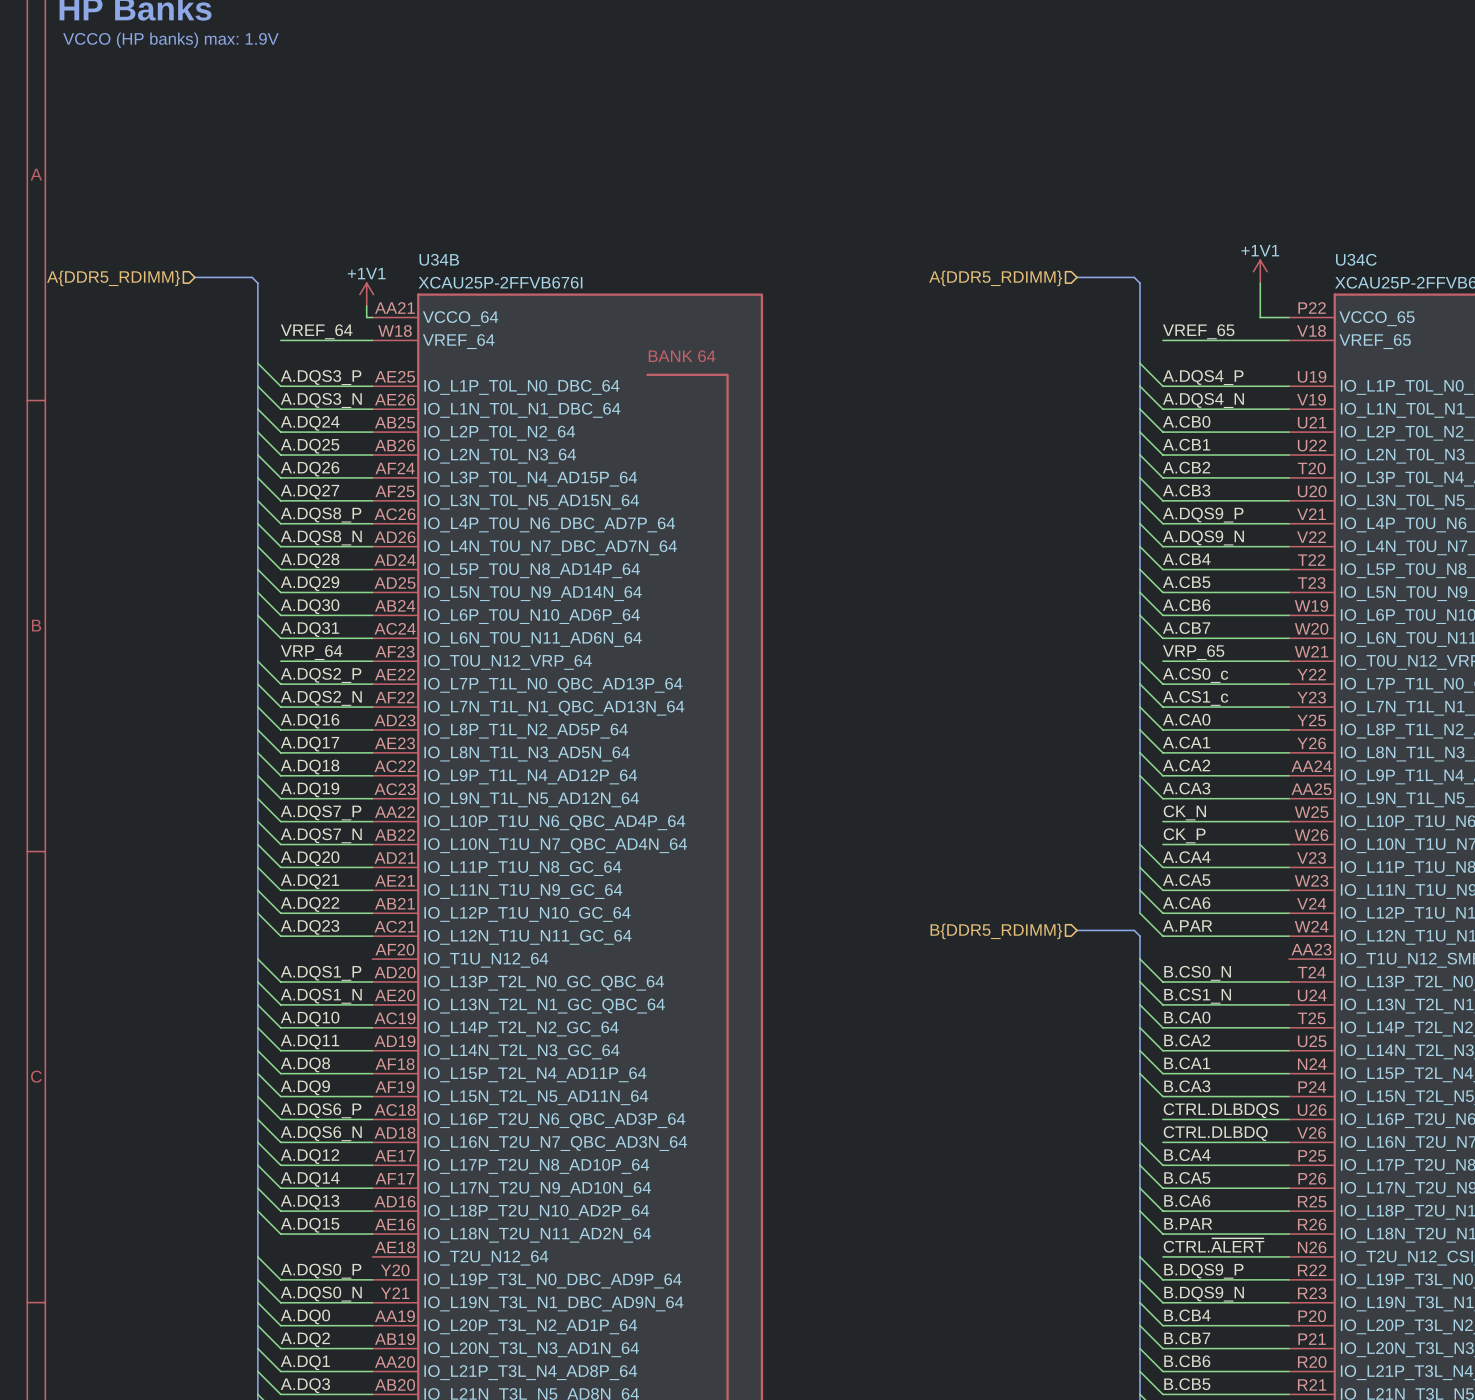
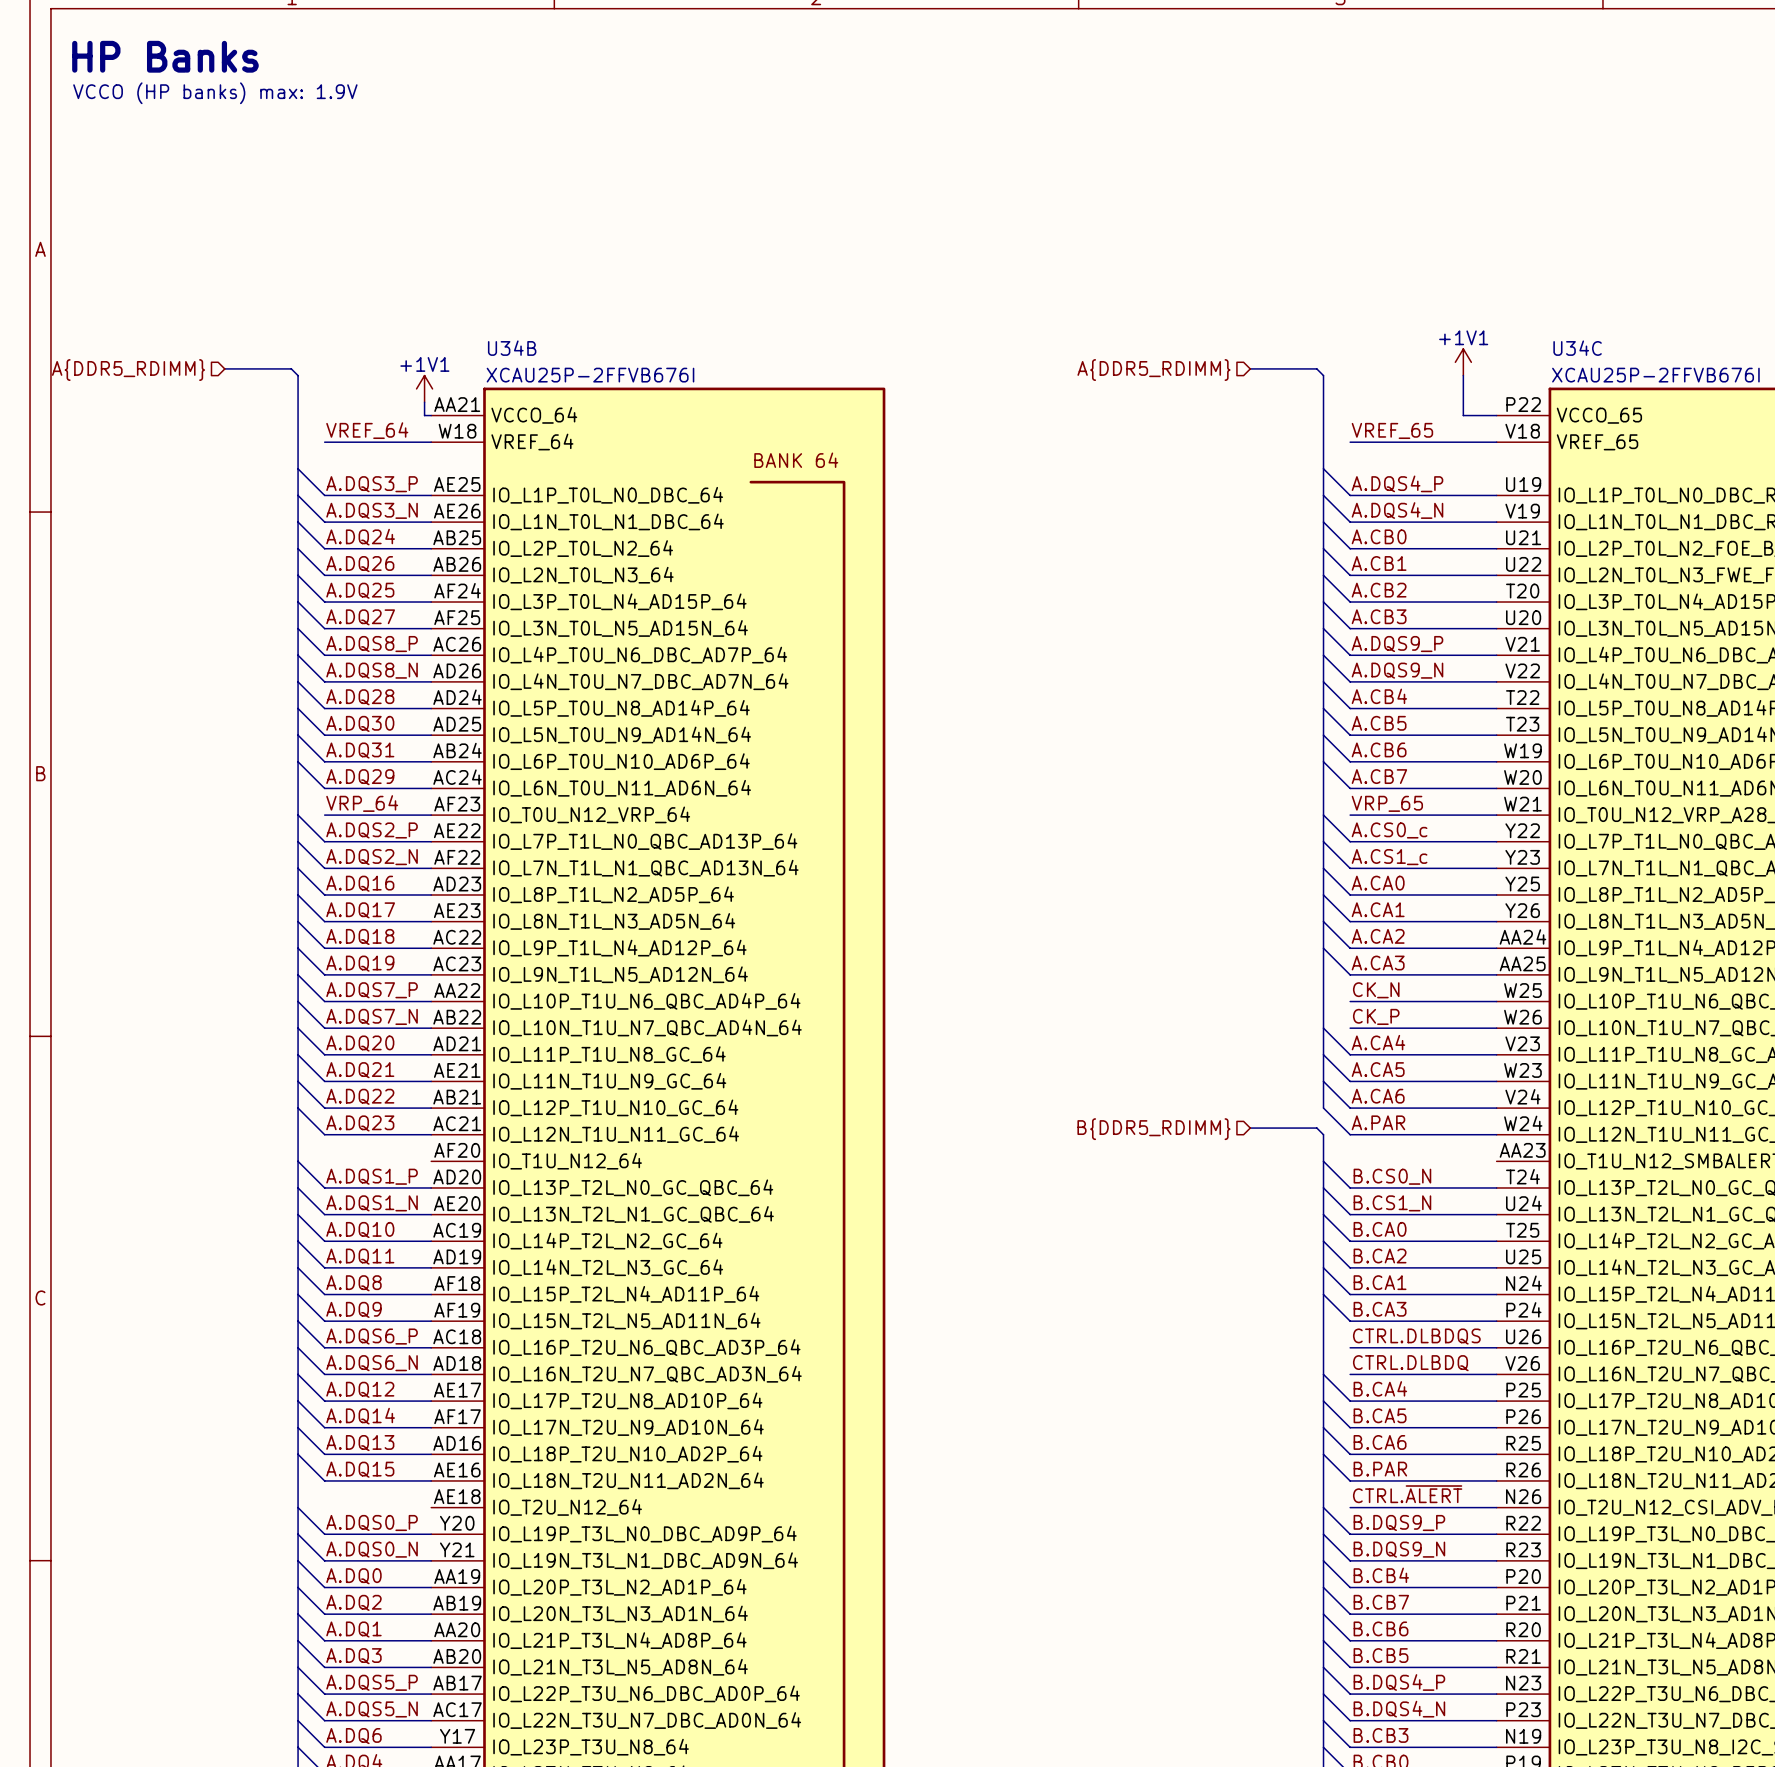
label: A.DQ25 (310, 446) -> A.DQ26 (360, 564)
label: A.DQ26 (310, 469) -> A.DQ25 (360, 590)
label: A.DQ29 (310, 583) -> A.DQ30 (360, 723)
label: A.DQ30 (310, 606) -> A.DQ31 (360, 750)
label: A.DQ31 (310, 629) -> A.DQ29 (360, 777)

